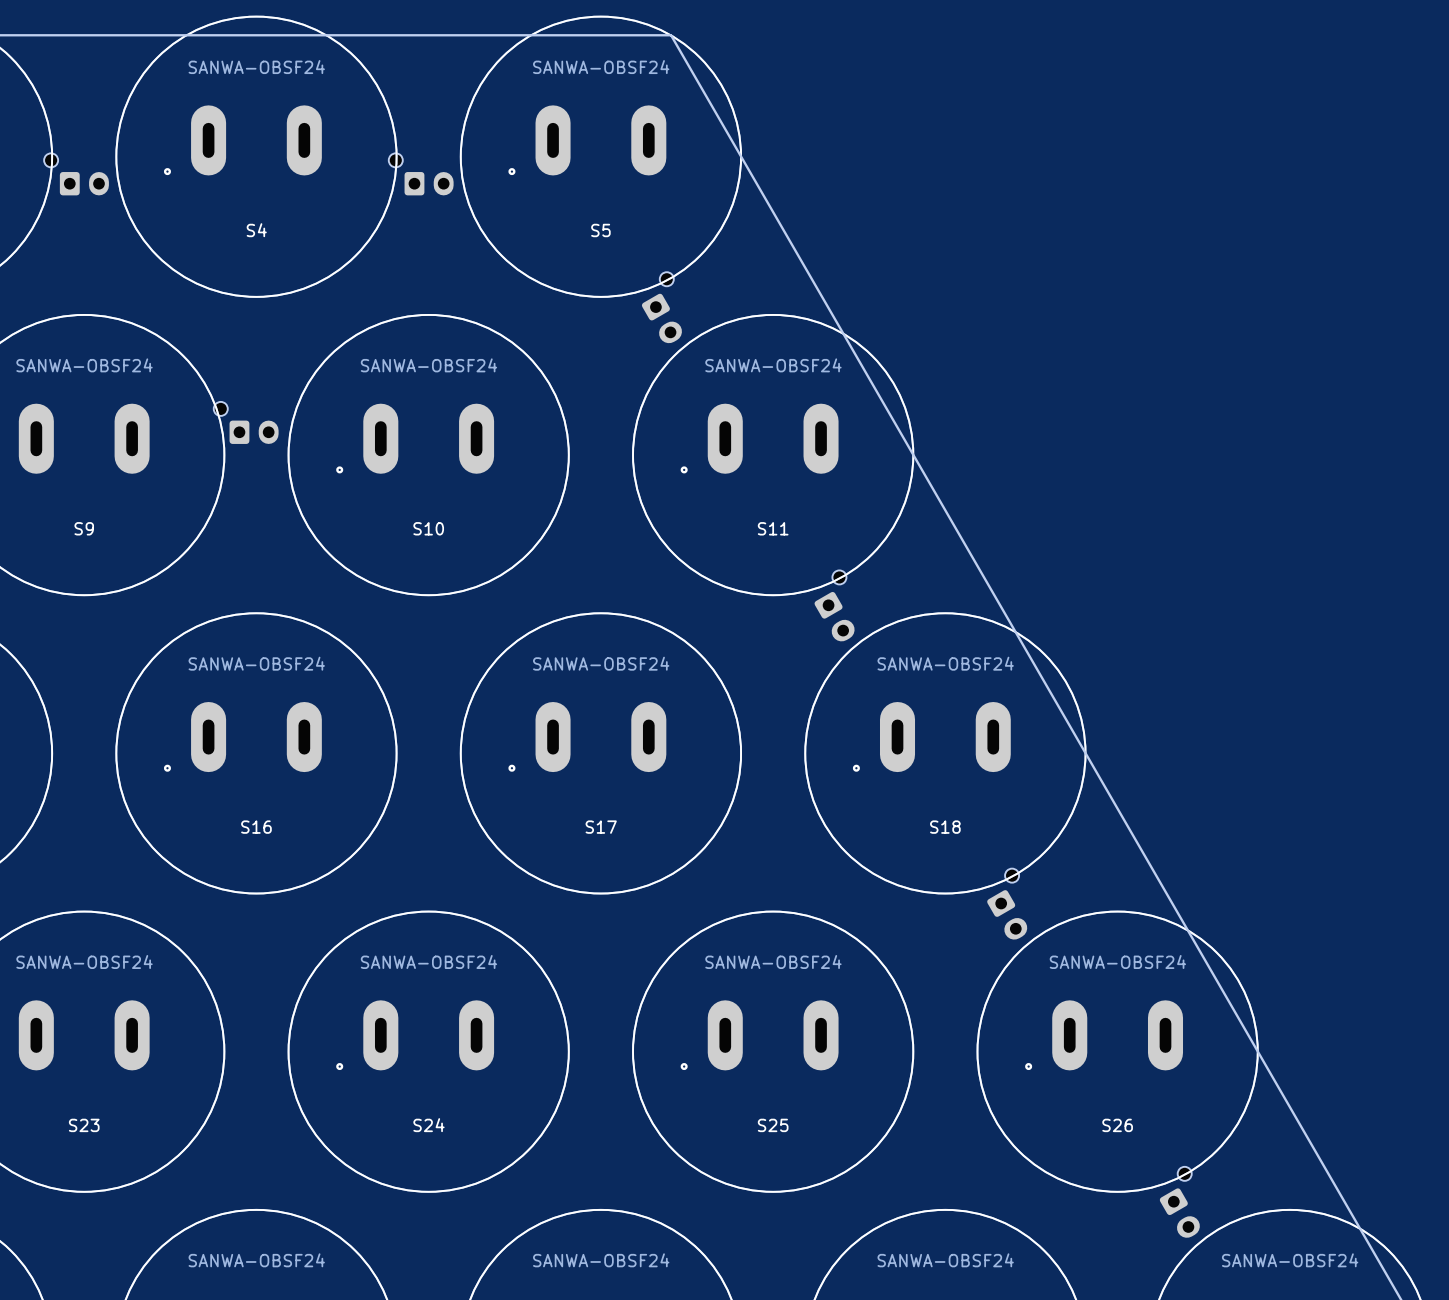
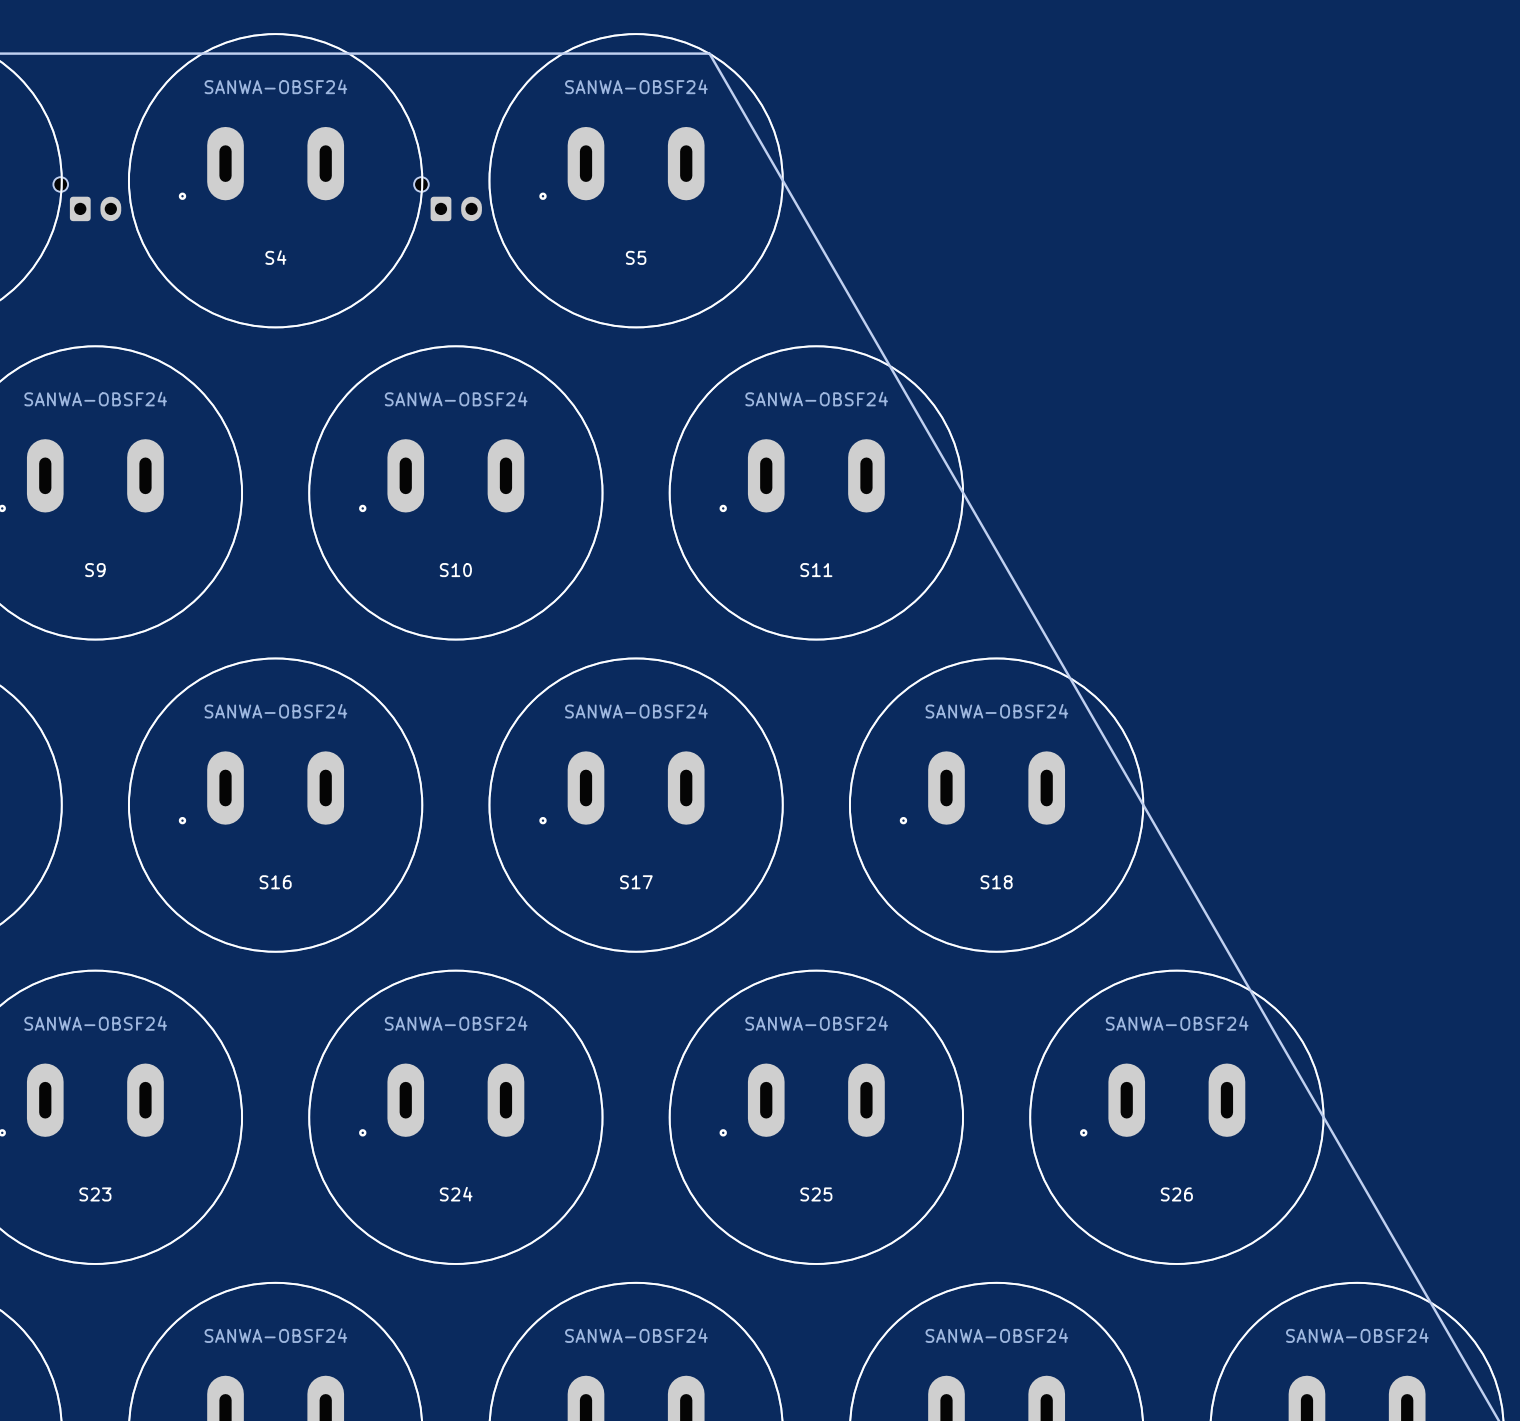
part: (661, 307) -> none
part: (246, 422) -> none
part: (834, 605) -> none
part: (1007, 904) -> none
part: (1179, 1202) -> none

